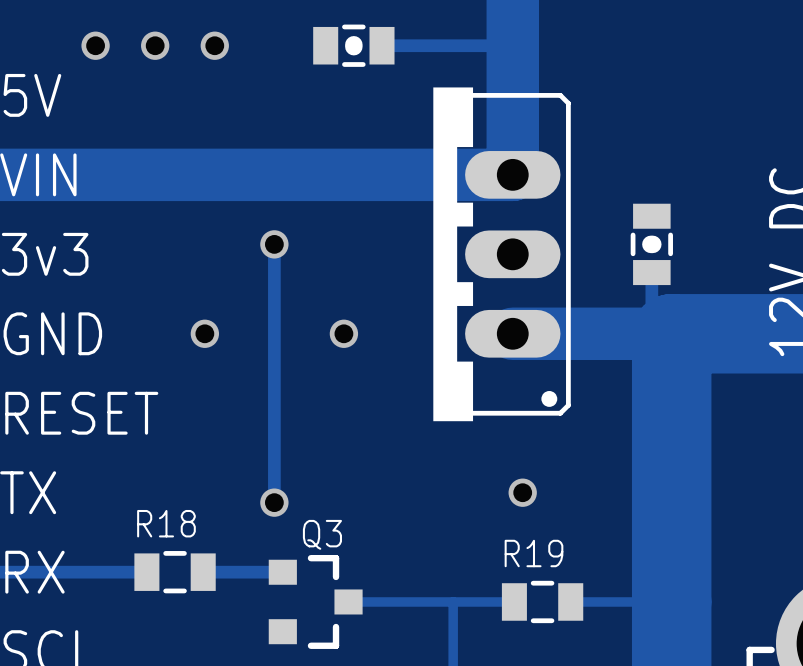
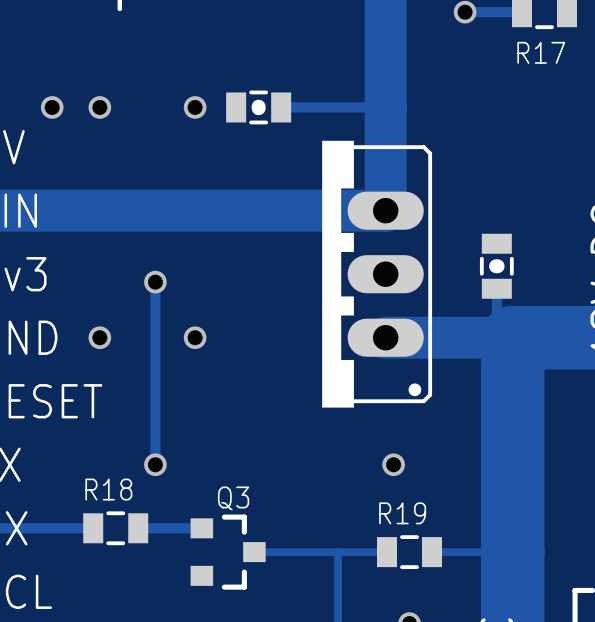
via position: (214, 45) -> (195, 107)
track: (274, 244) (274, 502) -> none
via: (274, 244) -> none
track: none -> (155, 282) (155, 464)
via: none -> (155, 282)
via: none -> (99, 337)
via: (204, 333) -> none
via: none -> (195, 337)
via: (343, 333) -> none
via position: (274, 502) -> (155, 464)

